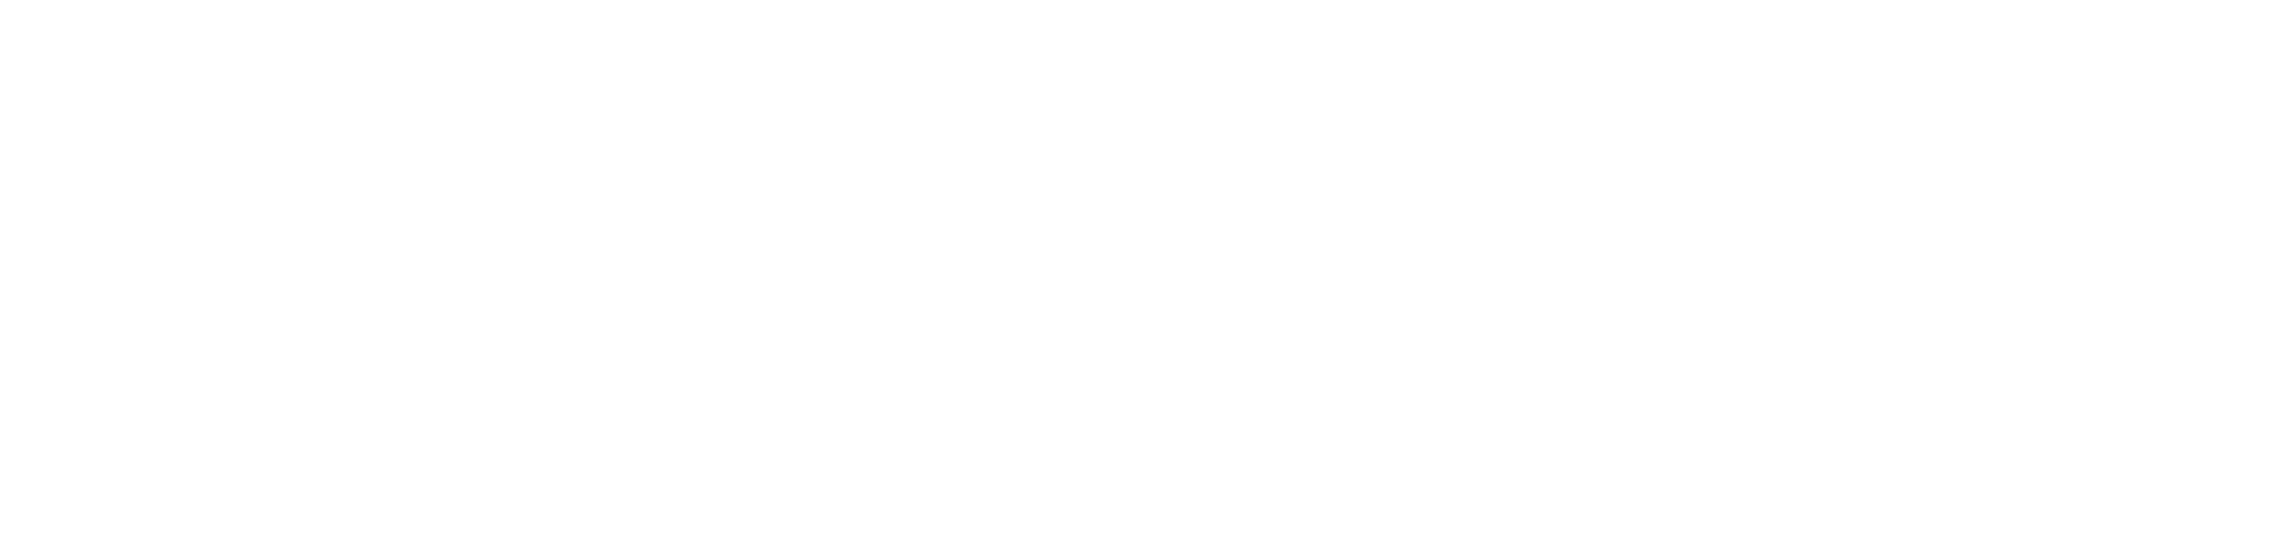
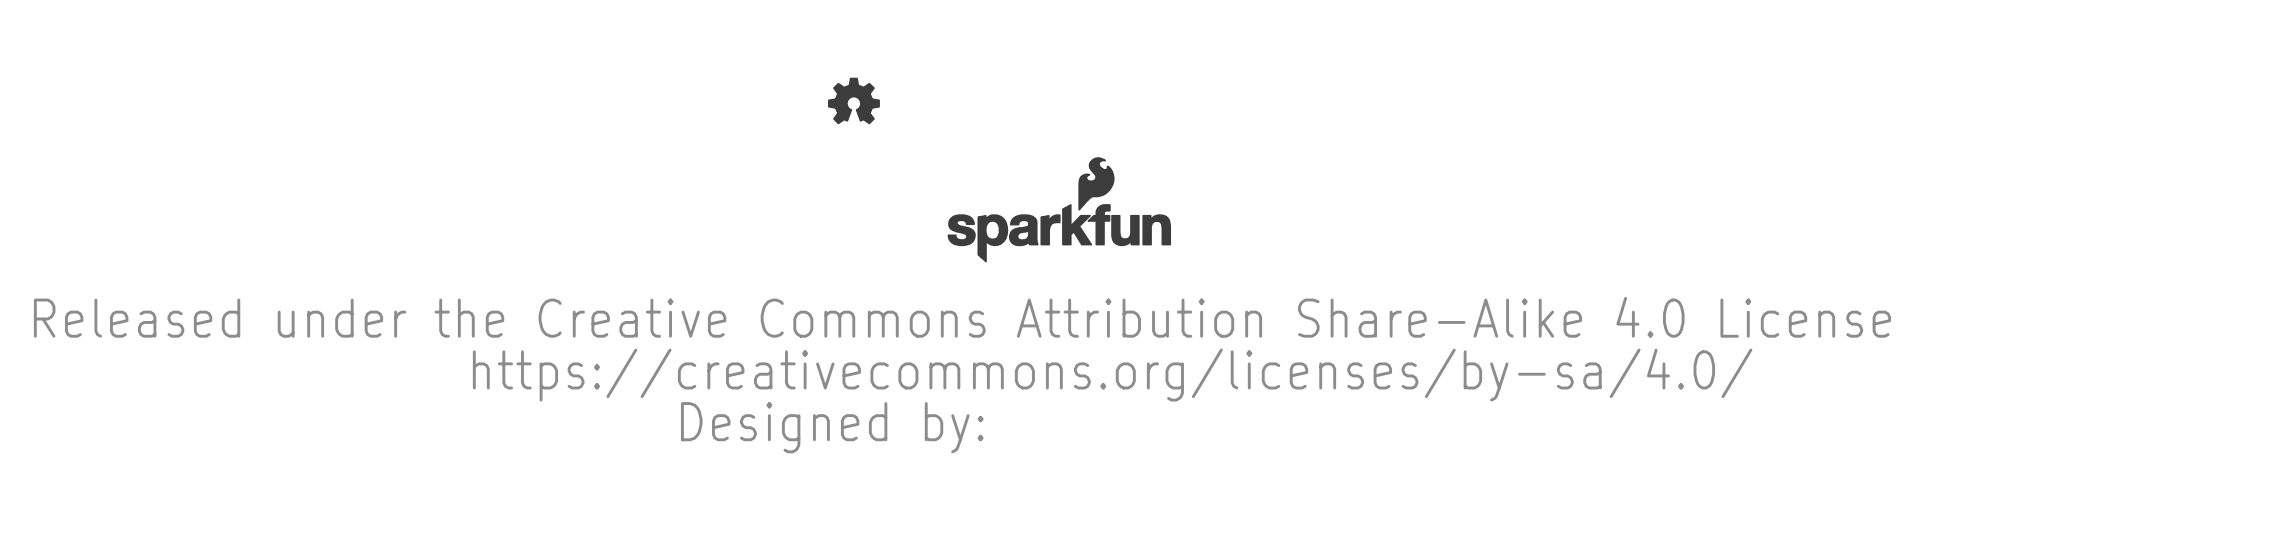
drawing: none -> [828, 77, 880, 125]
drawing: none -> [947, 157, 1172, 263]

